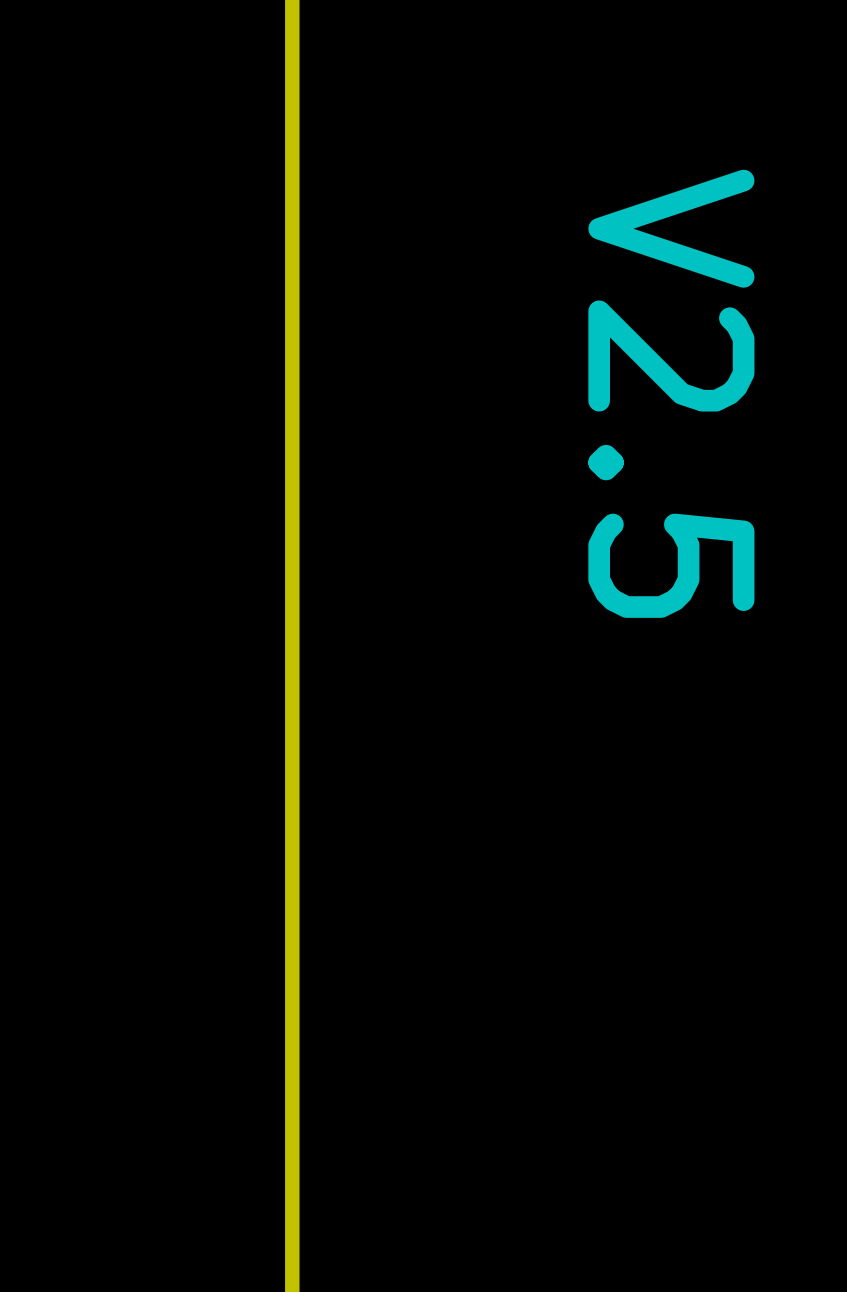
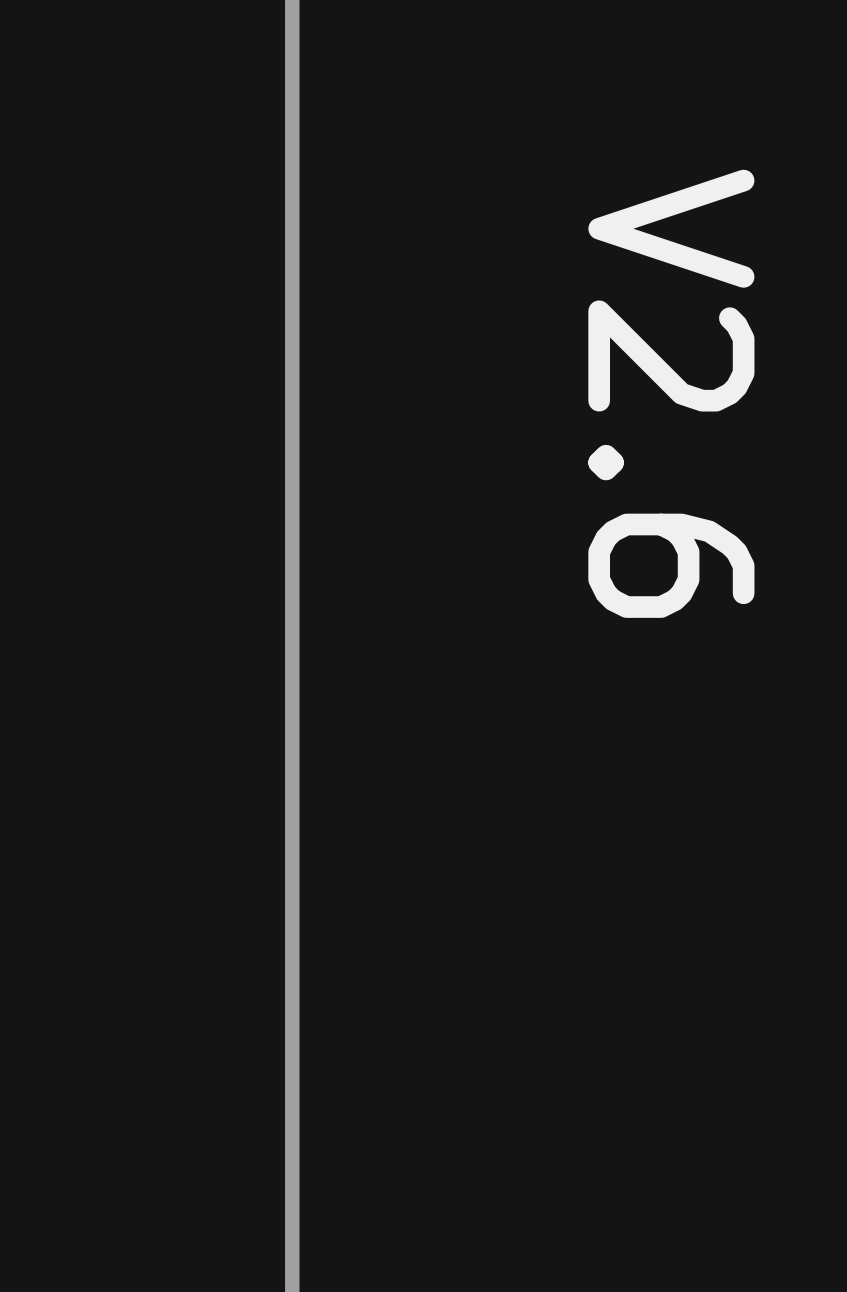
text: V2.5 (671, 393) -> V2.6 (671, 393)

